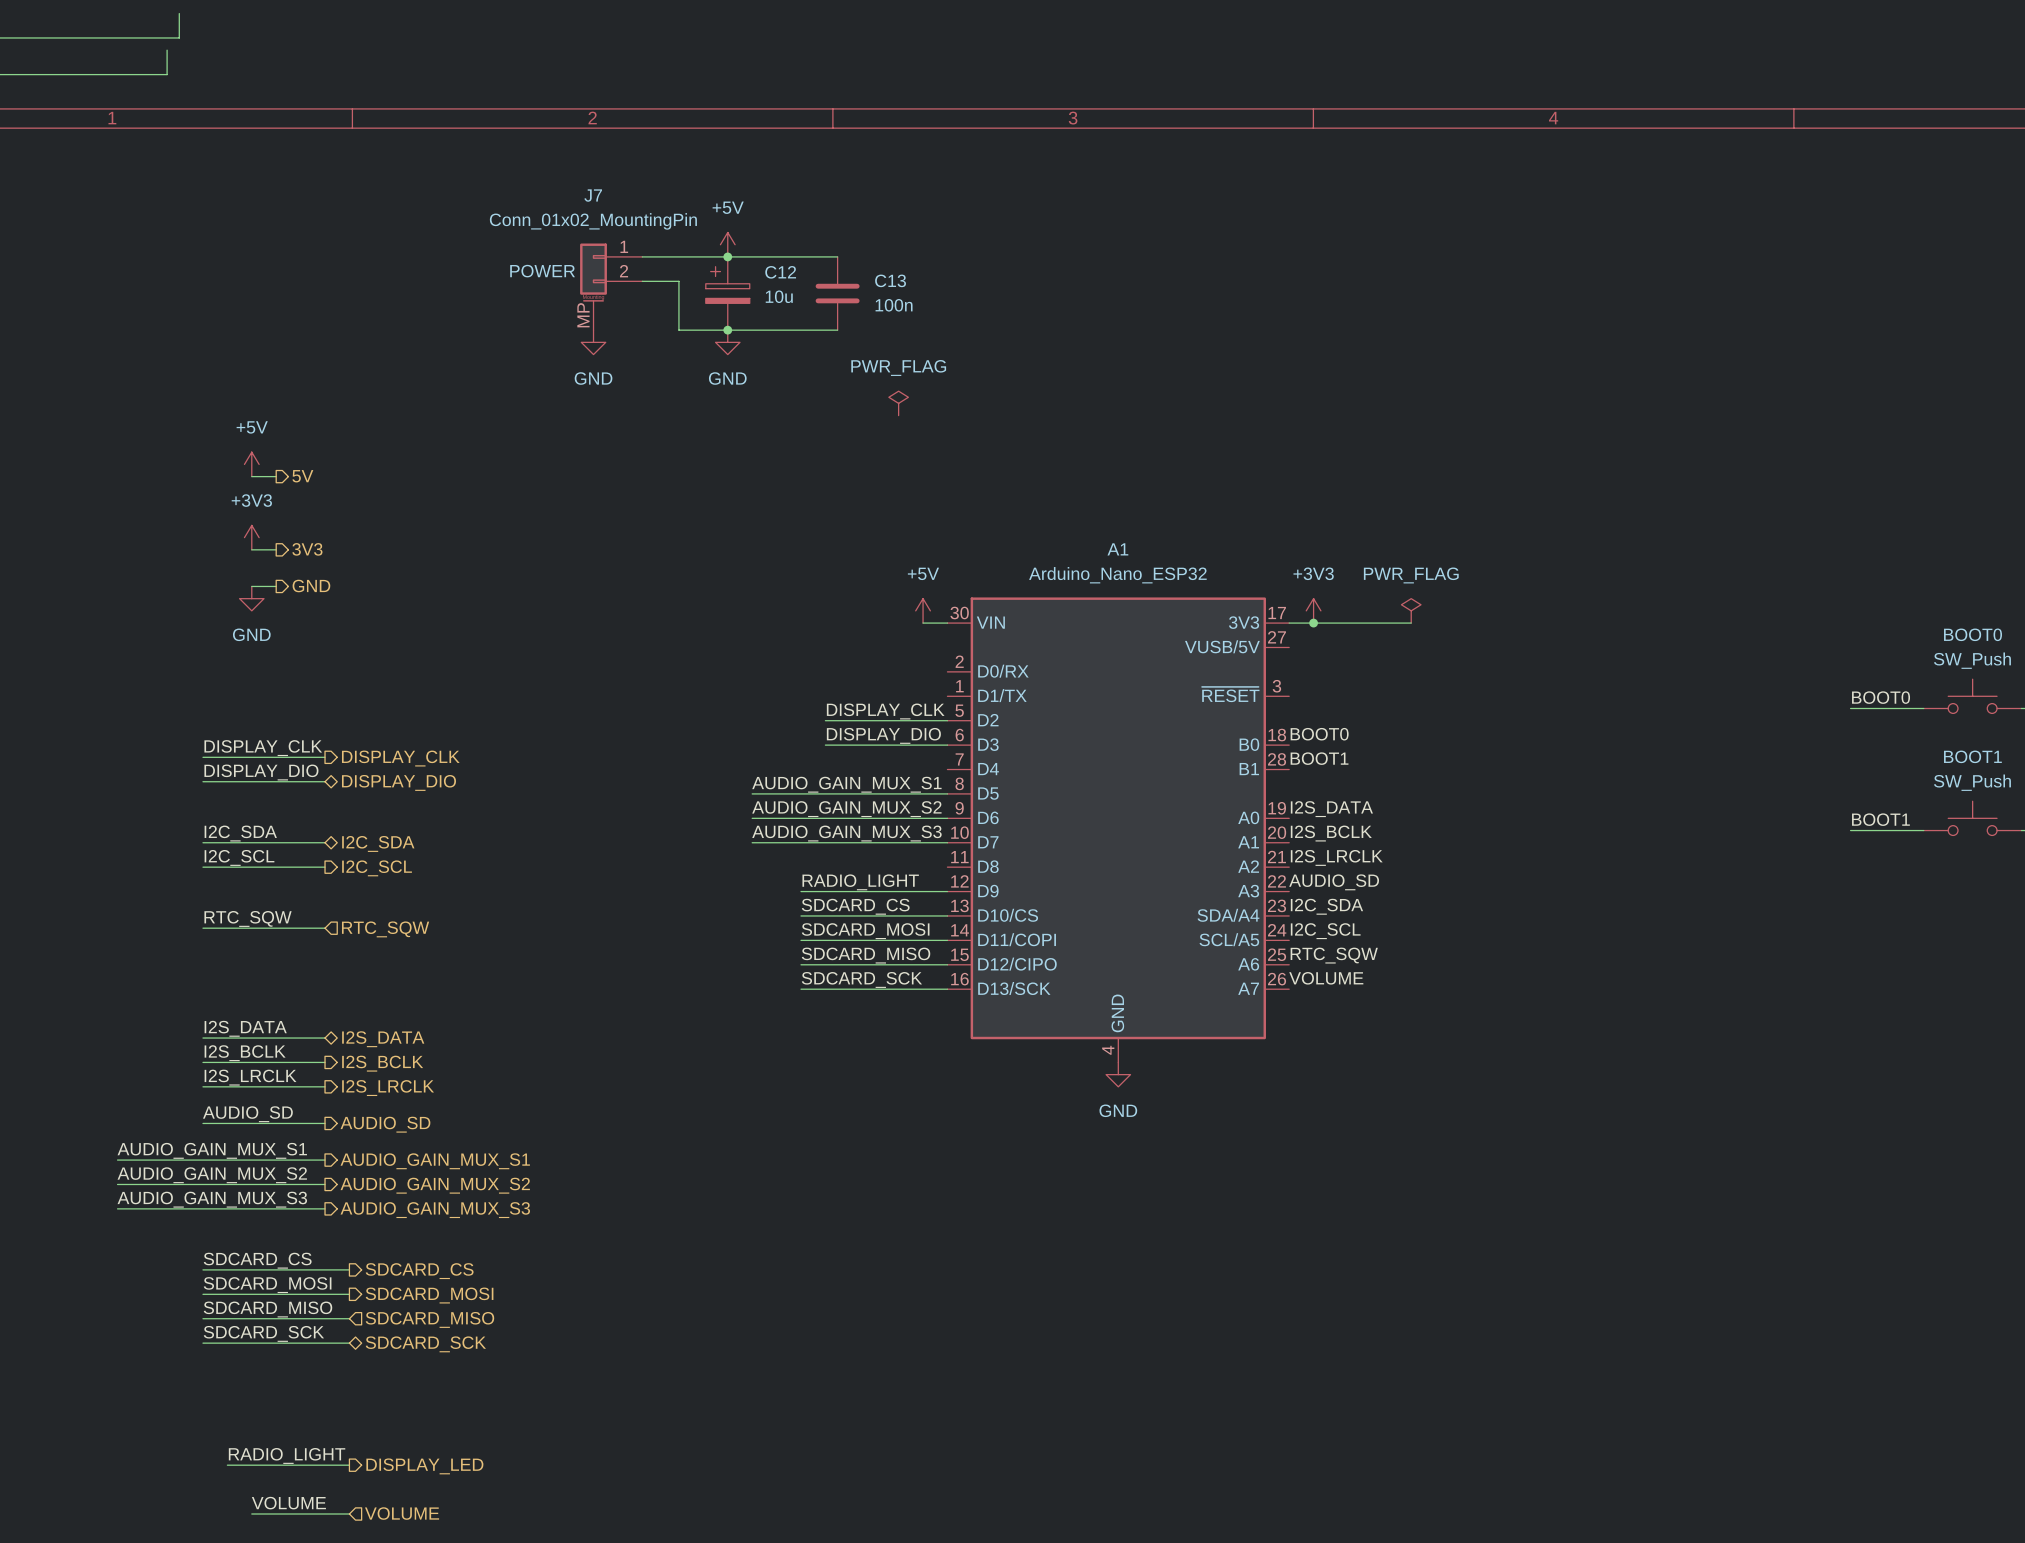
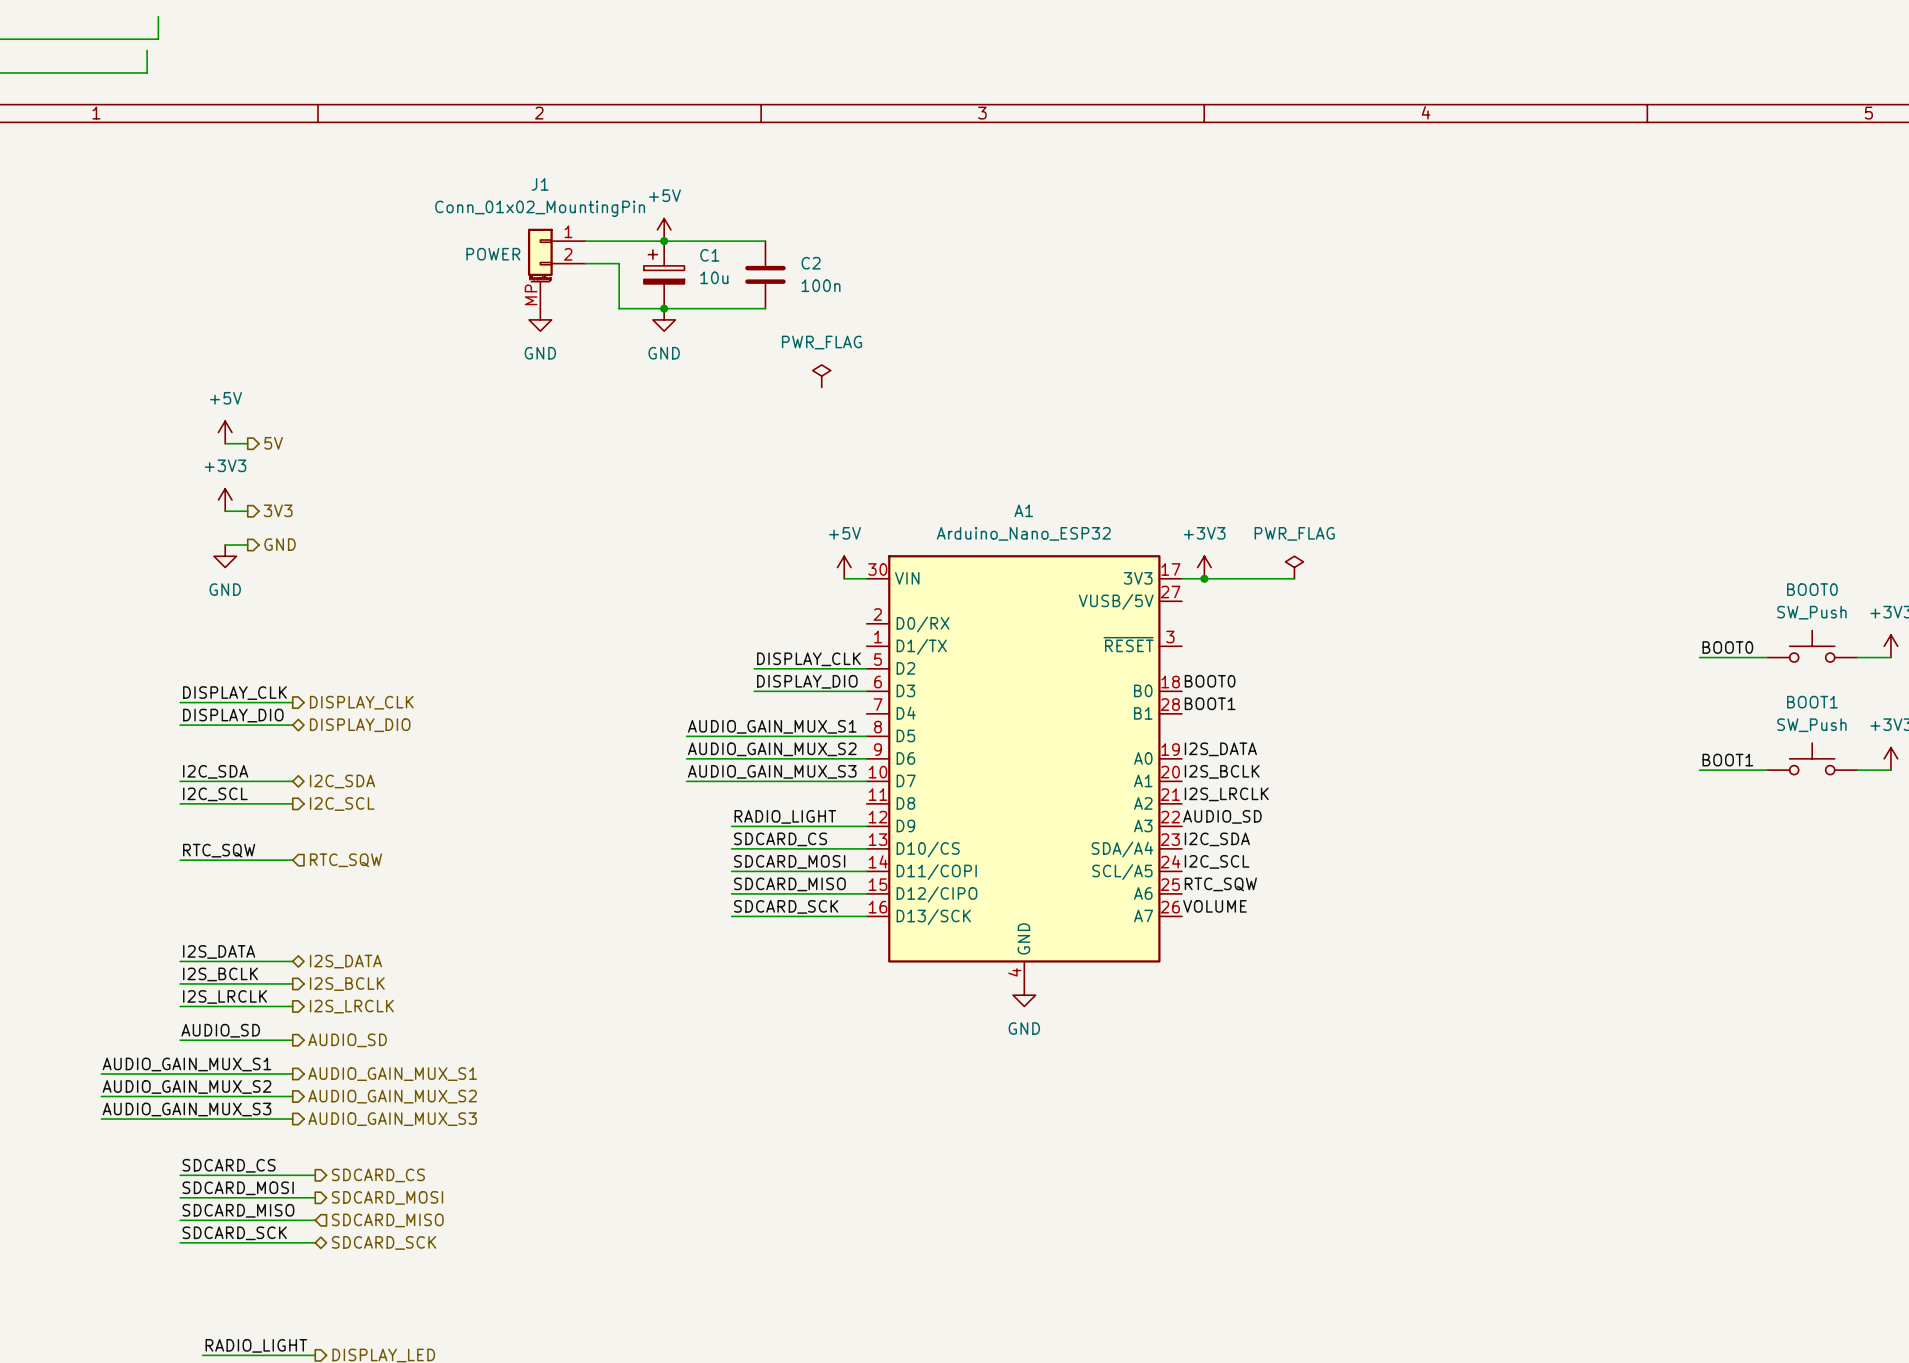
J7 name: J7 (593, 195) -> J1 (540, 184)
C12 name: C12 (780, 272) -> C1 (709, 255)
C13 name: C13 (890, 280) -> C2 (811, 263)

